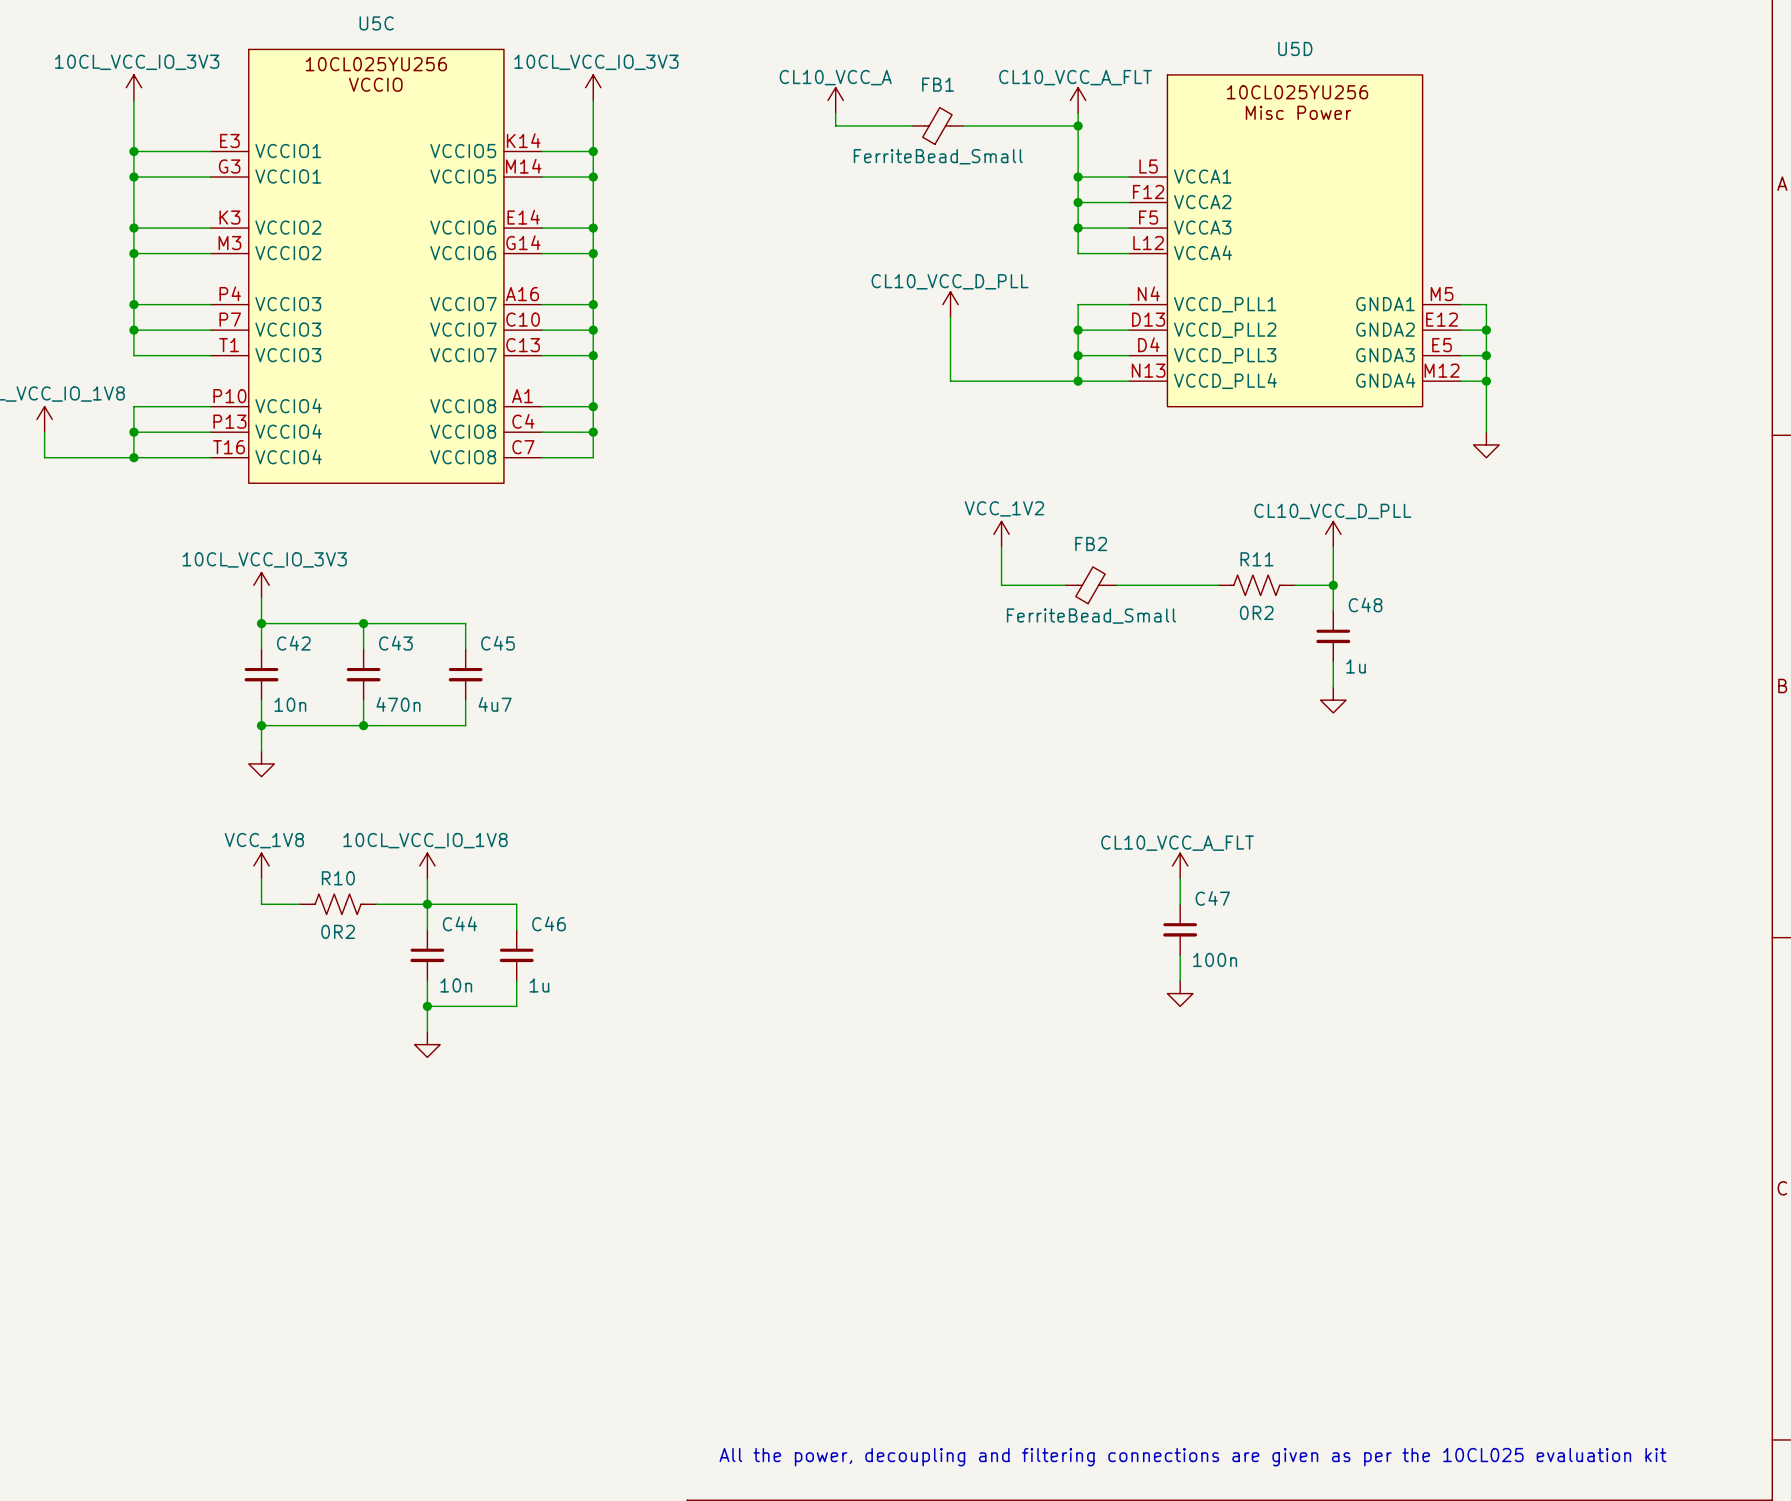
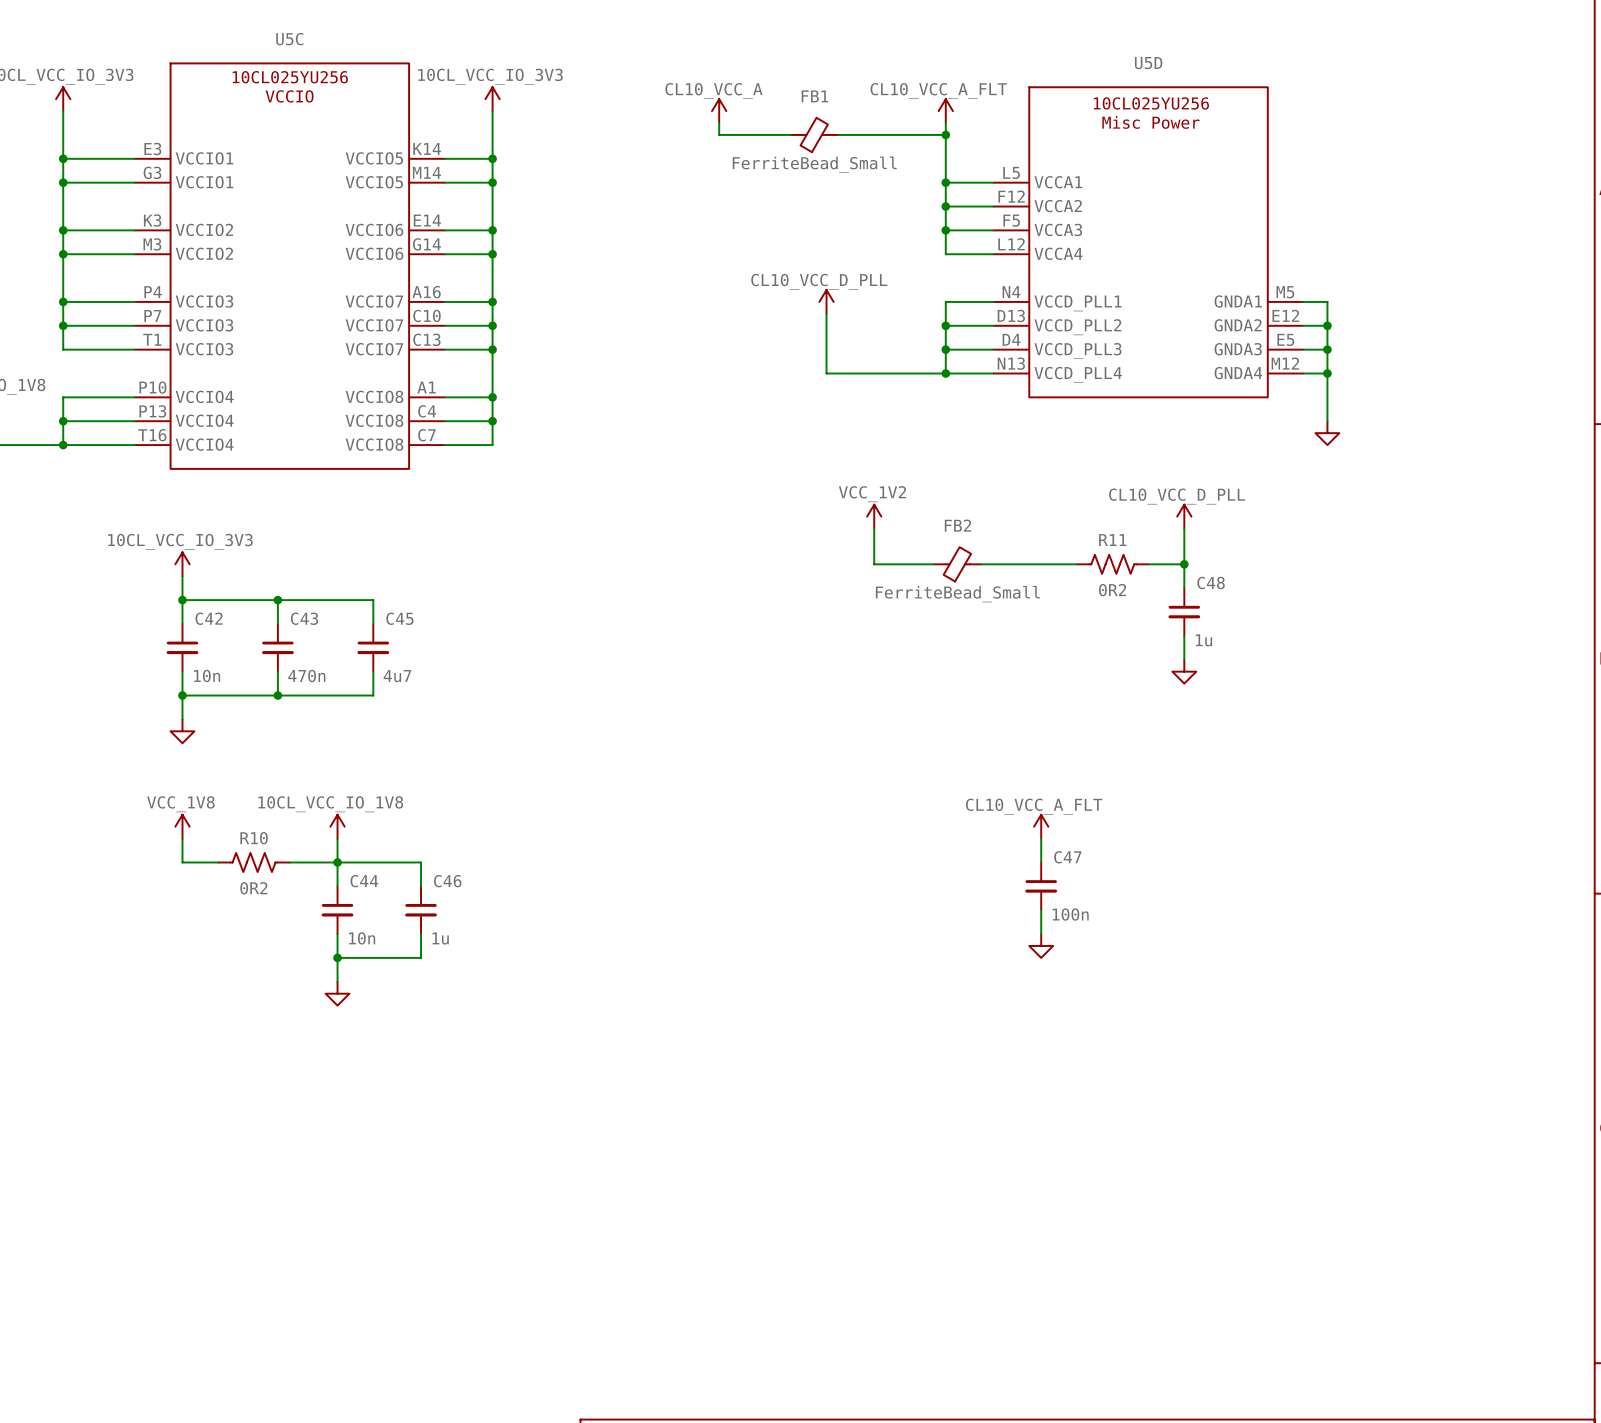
text: All the power, decoupling and filtering connections are given as per the 10CL025 evaluation kit (1192, 1457) -> none

